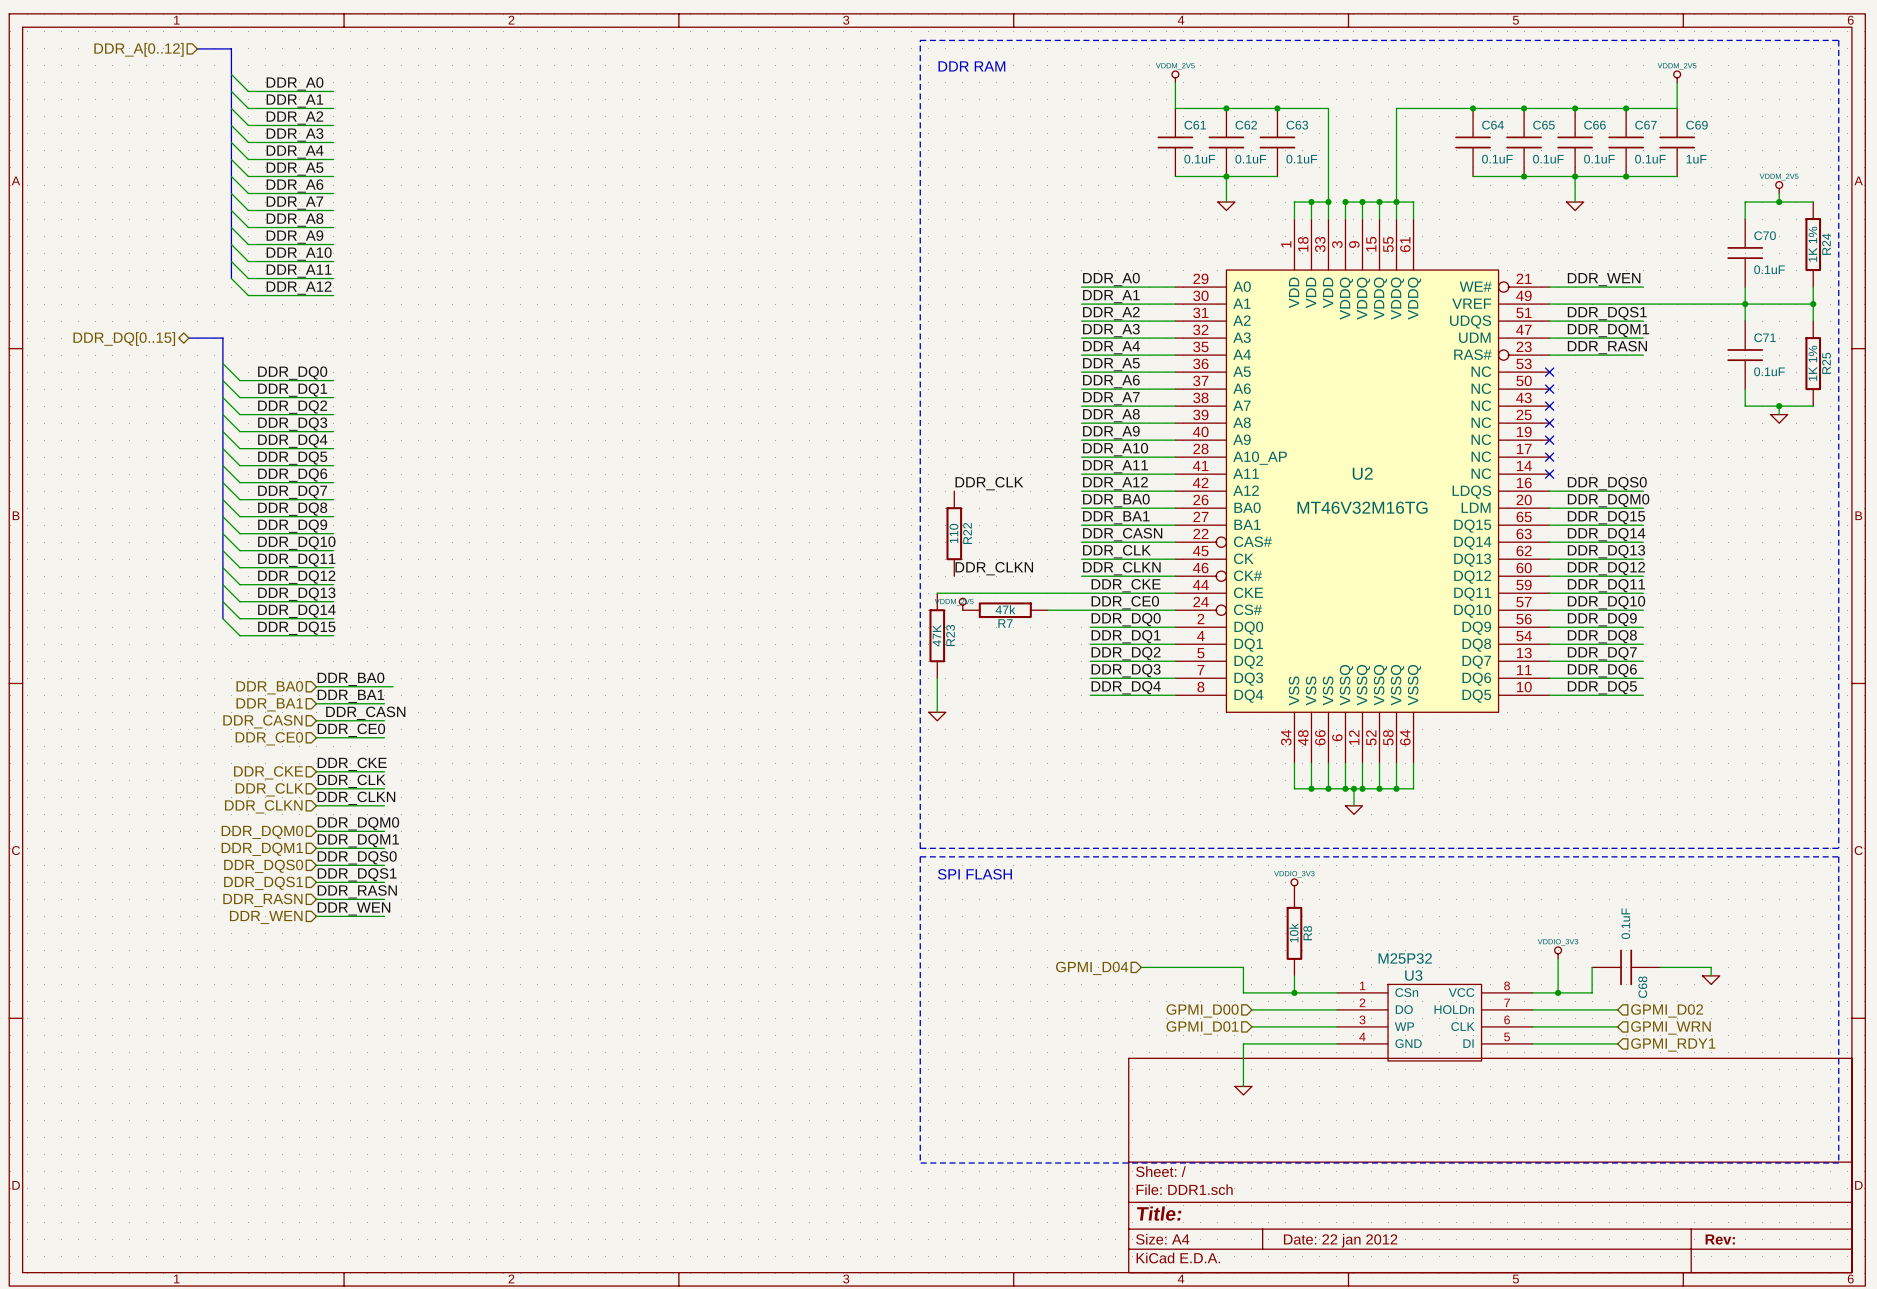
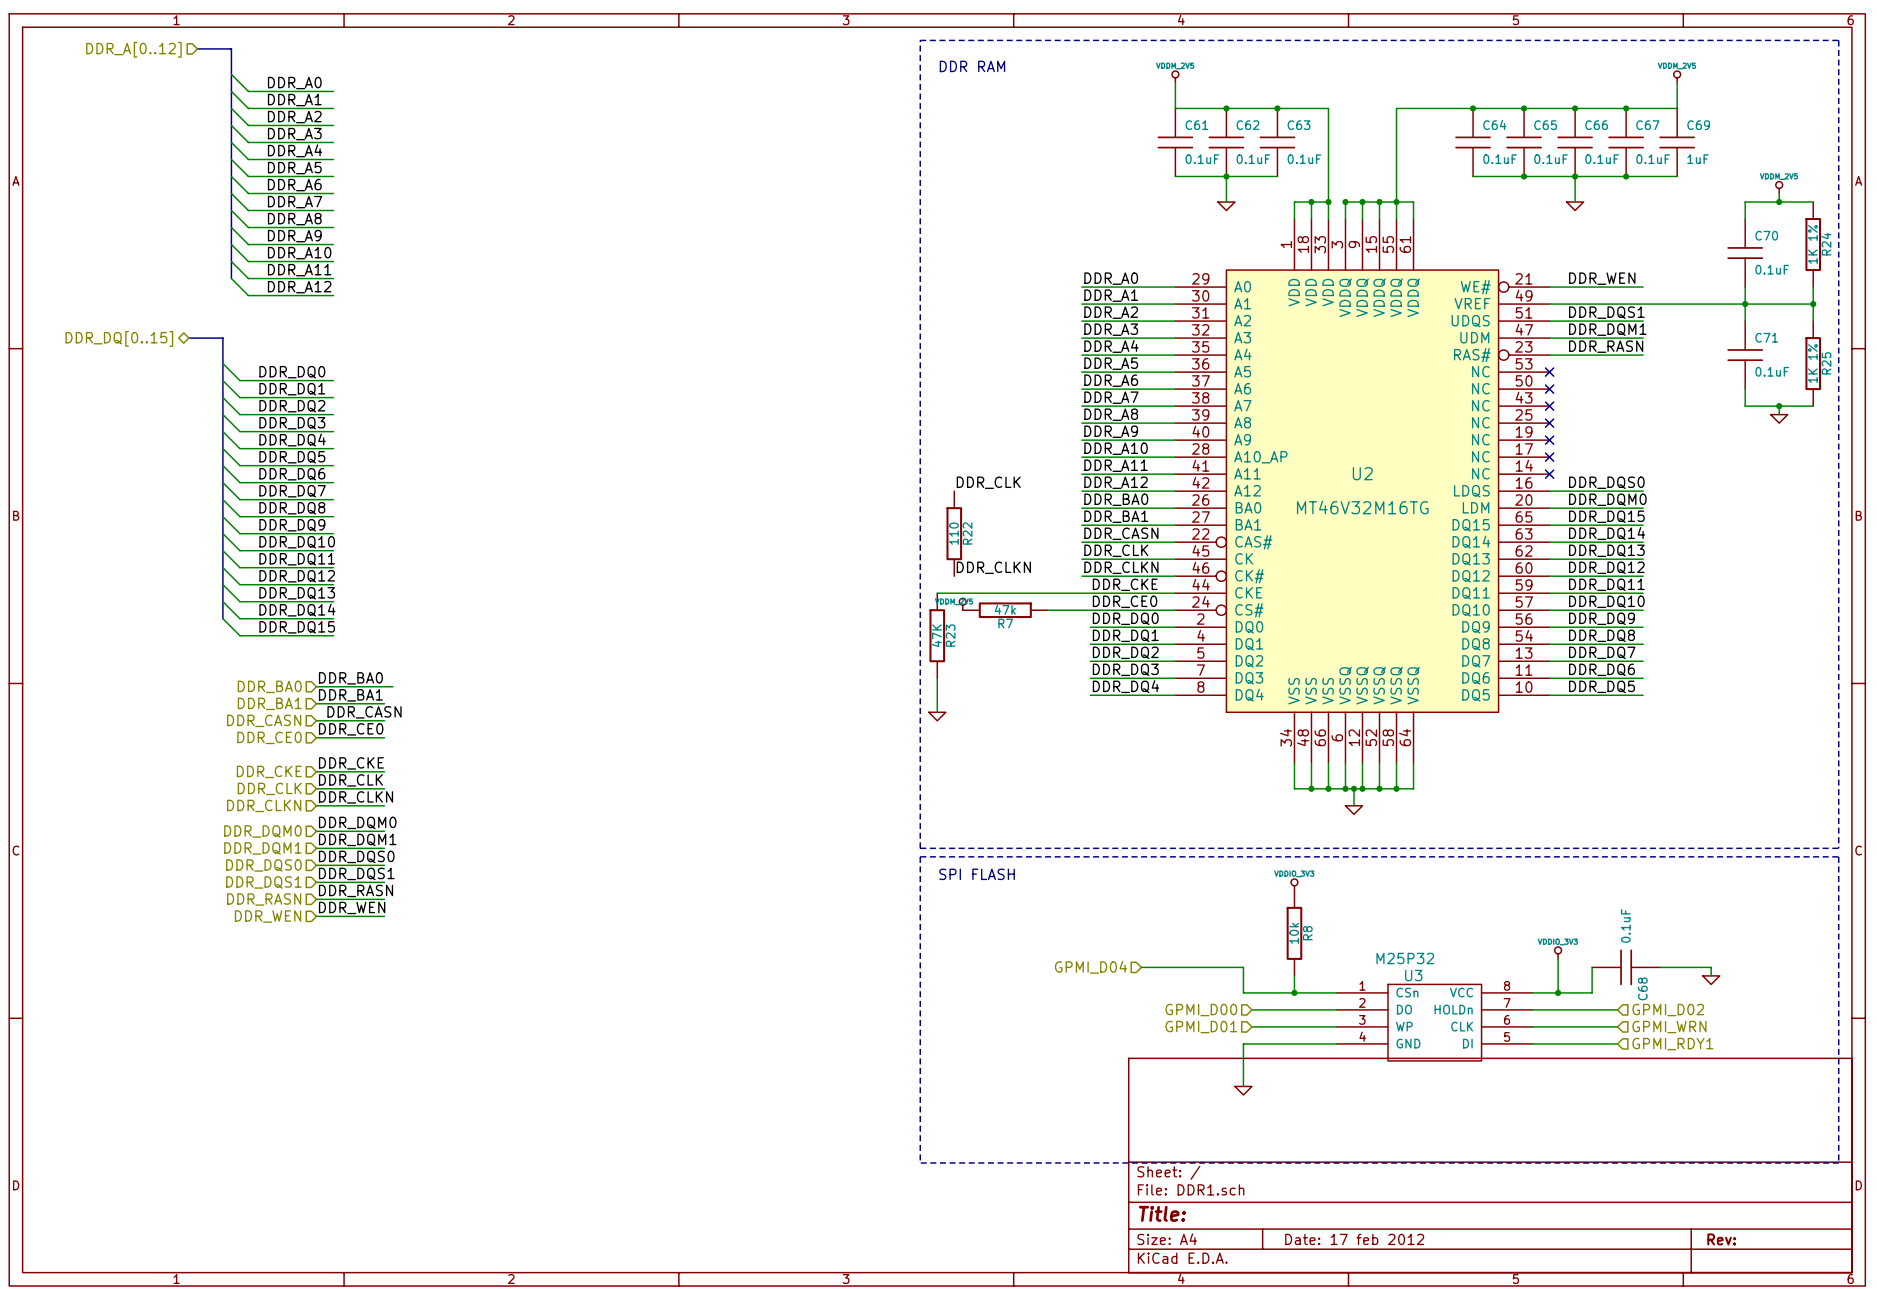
title block: Date: 22 jan 2012 (1340, 1240) -> Date: 17 feb 2012 (1354, 1239)

